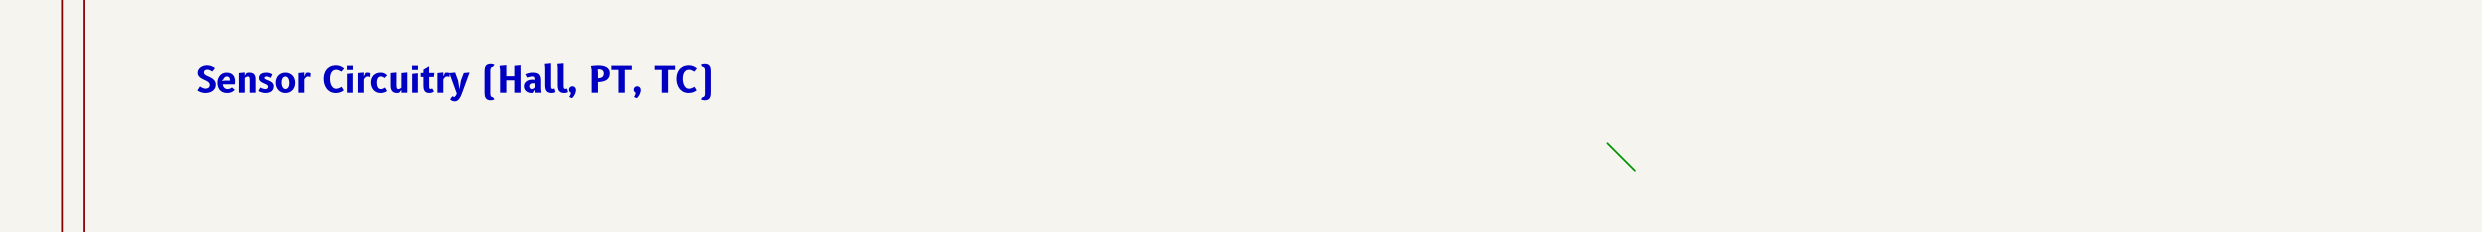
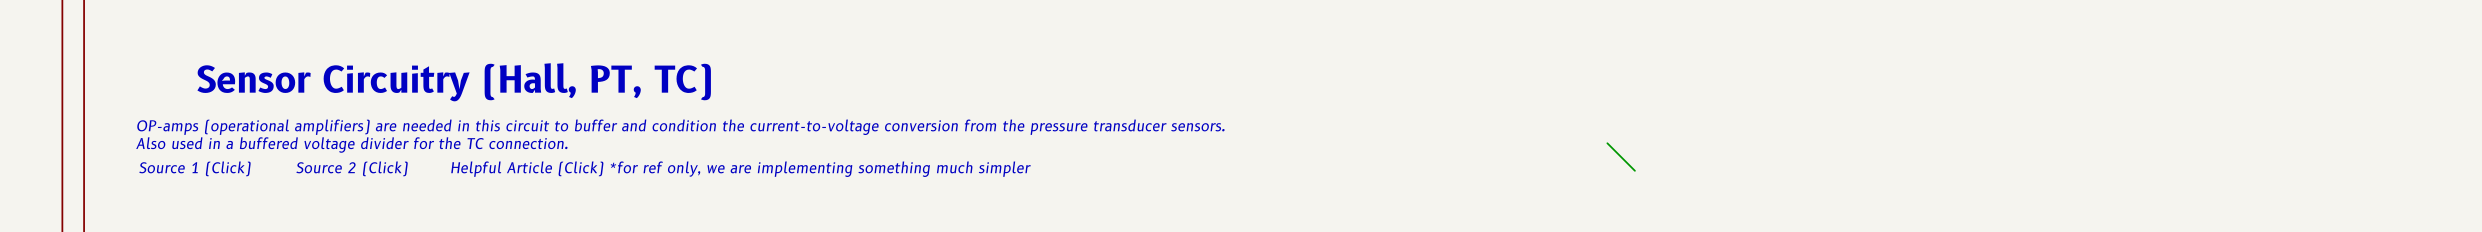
text: none -> OP-amps (operational amplifiers) are needed in this circuit to buffer and condition the current-to-voltage conversion from the pressure transducer sensors. (680, 127)
text: none -> Also used in a buffered voltage divider for the TC connection. (351, 145)
text: none -> Source 1 (Click) (194, 168)
text: none -> Source 2 (Click) (351, 168)
text: none -> Helpful Article (Click) *for ref only, we are implementing something much simpler (740, 169)

